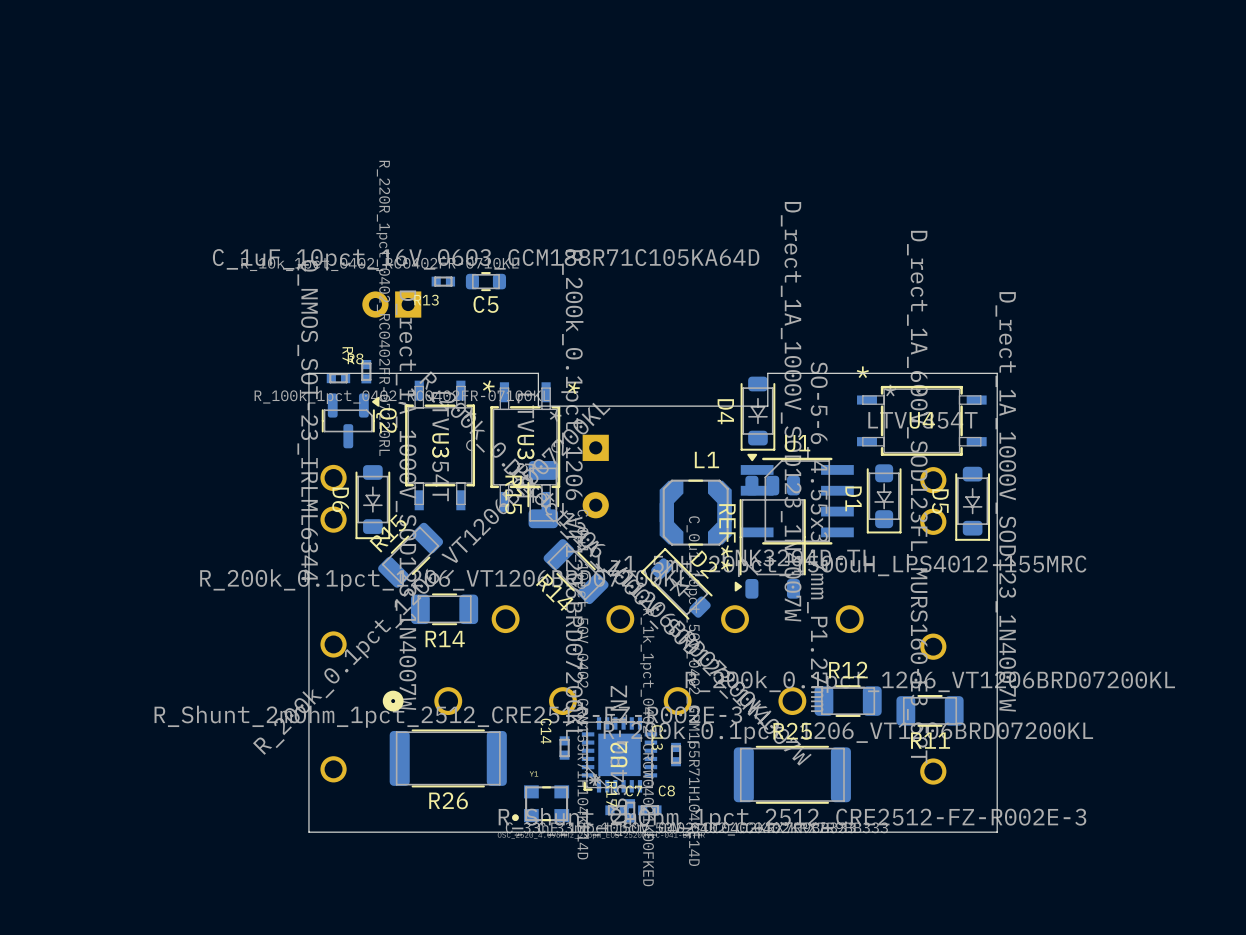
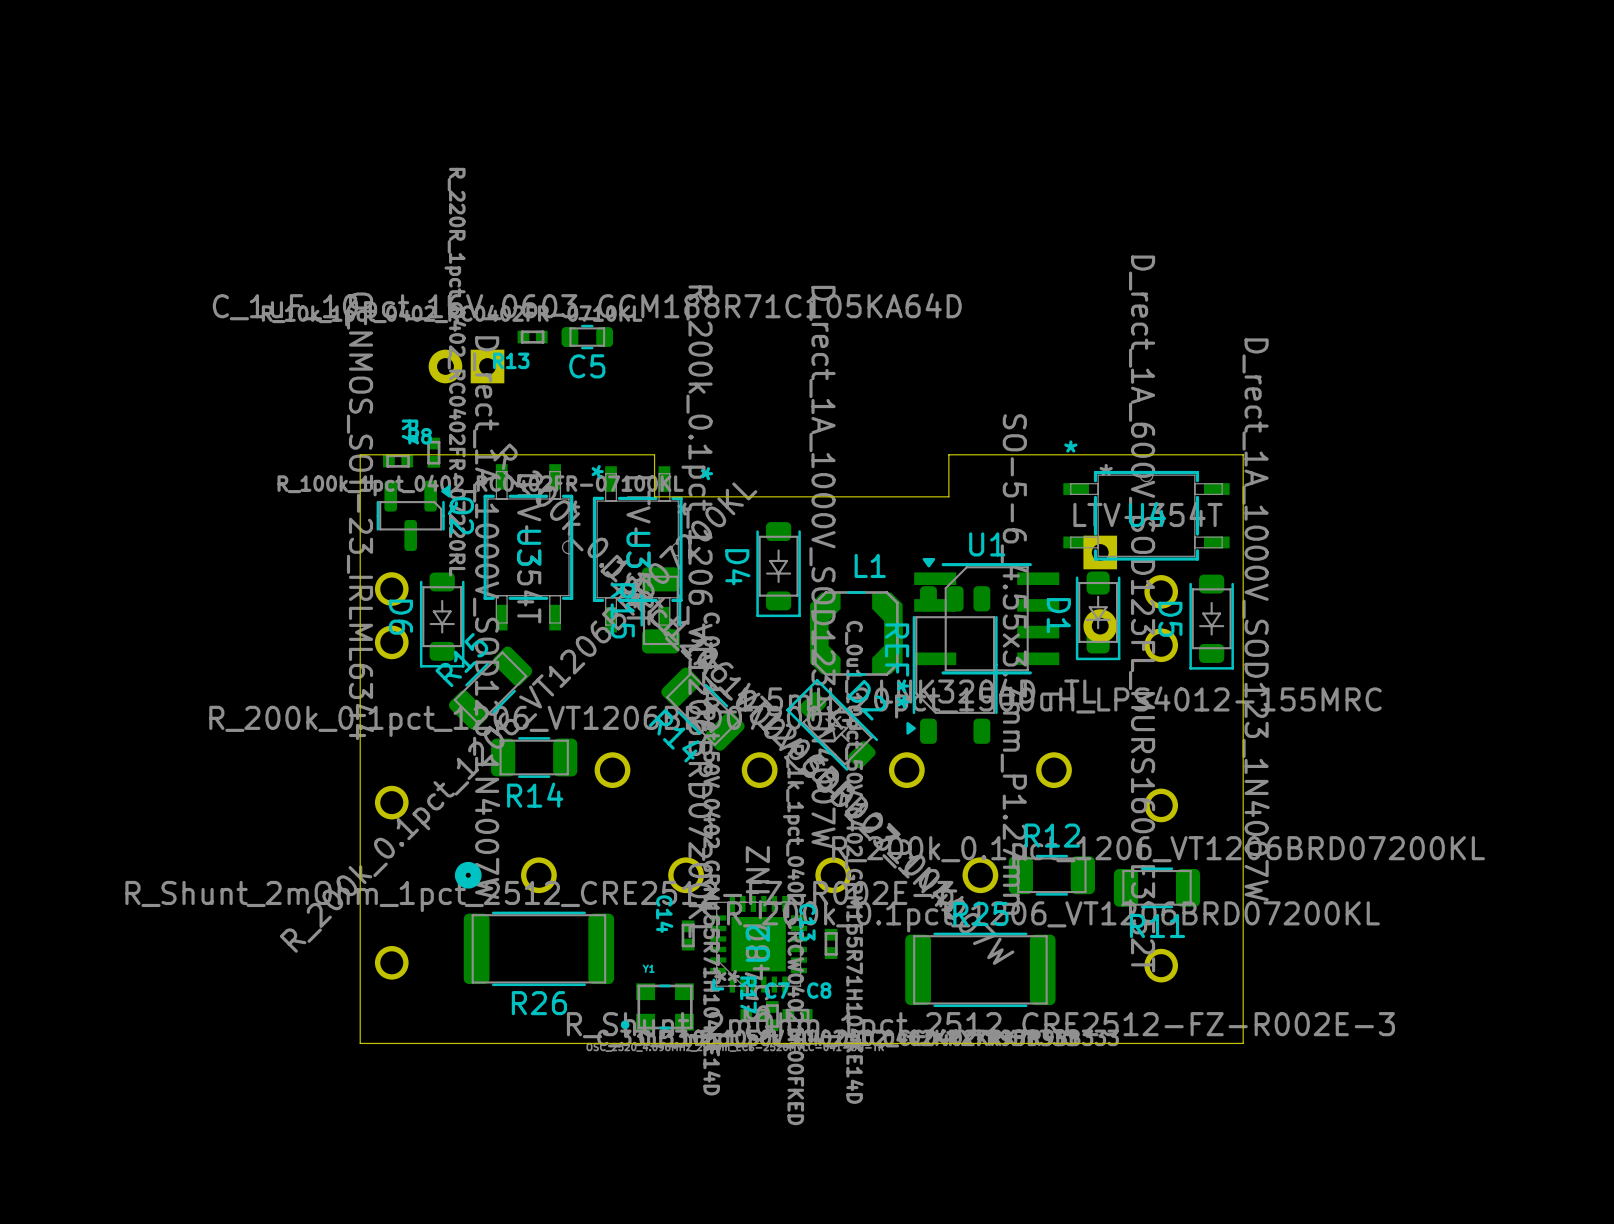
D4 position: (757, 413) -> (778, 569)
part position: (595, 476) -> (1100, 589)

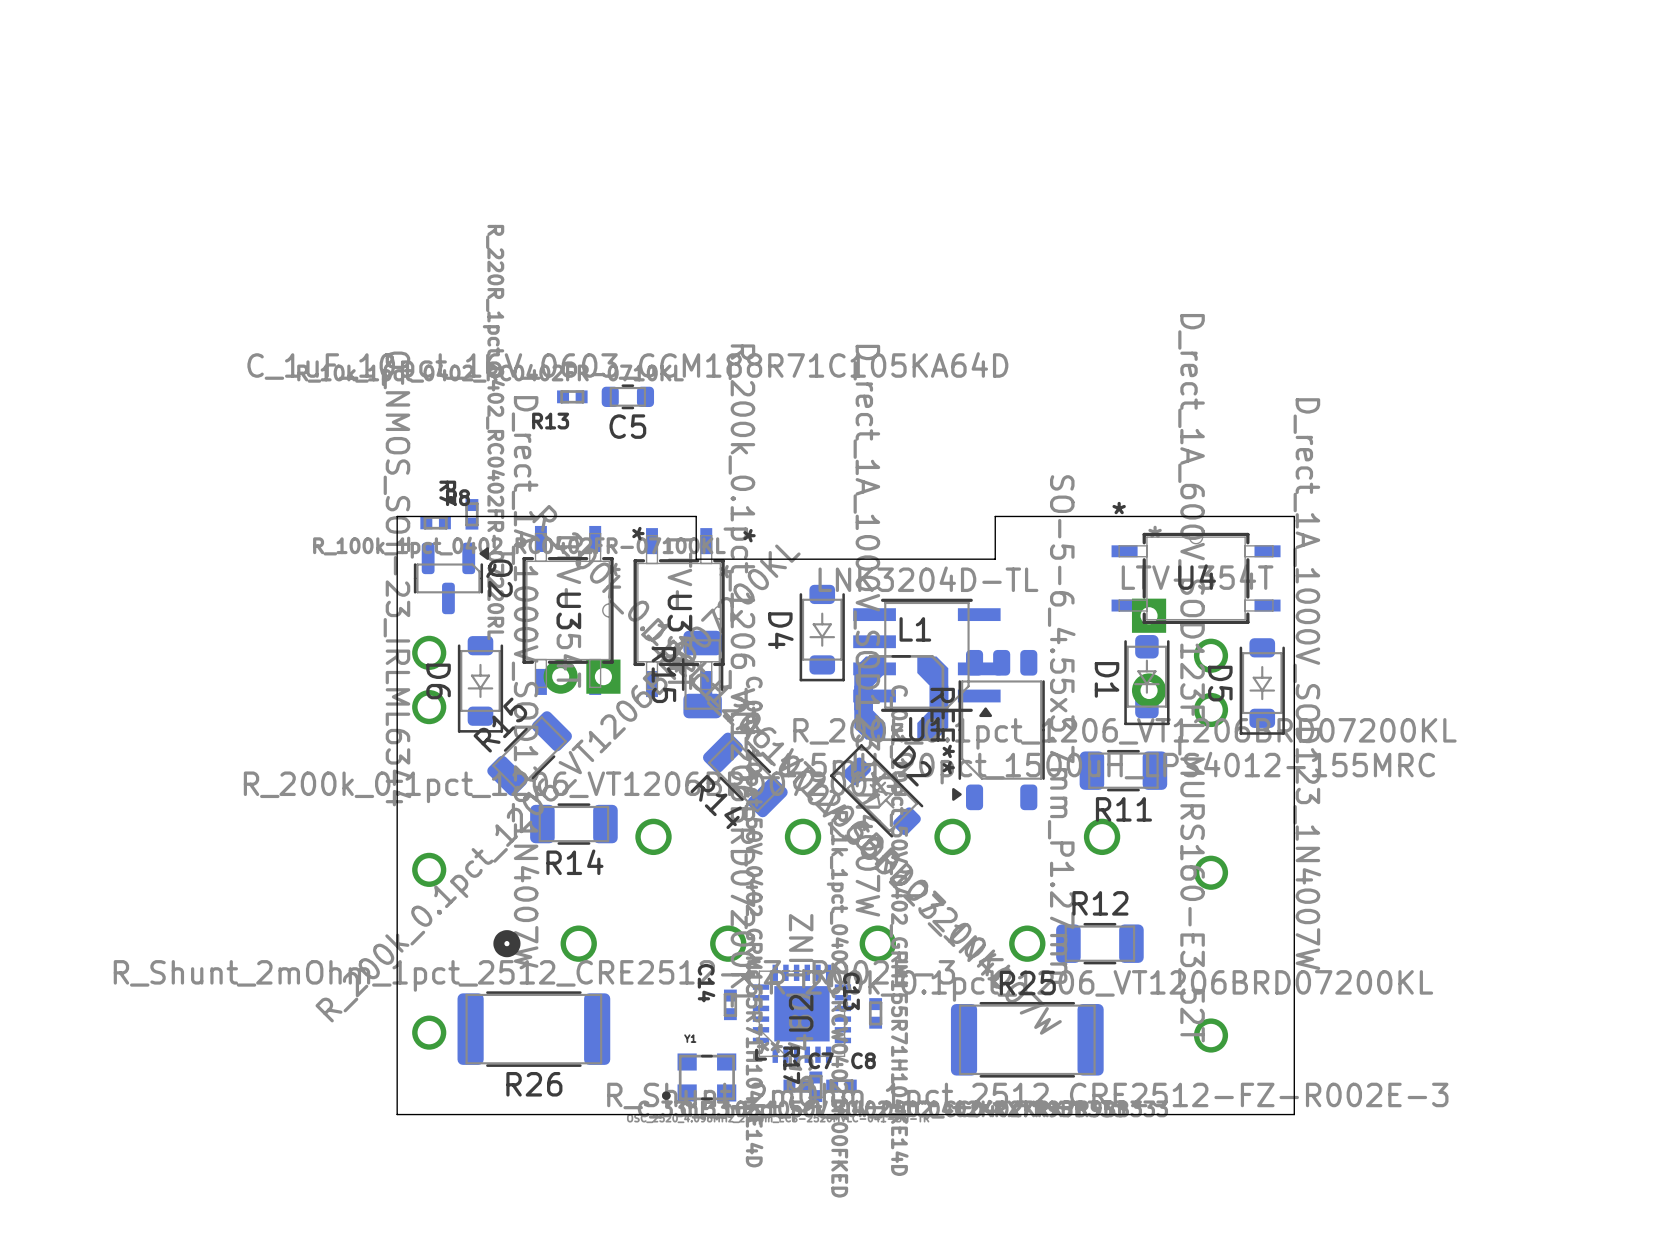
part position: (466, 366) -> (582, 676)
U1 rotation: 0° (986, 616) -> 180° (926, 657)
U1 position: (986, 616) -> (926, 657)
R11 position: (1157, 887) -> (1123, 770)
R26 position: (538, 948) -> (533, 1029)

